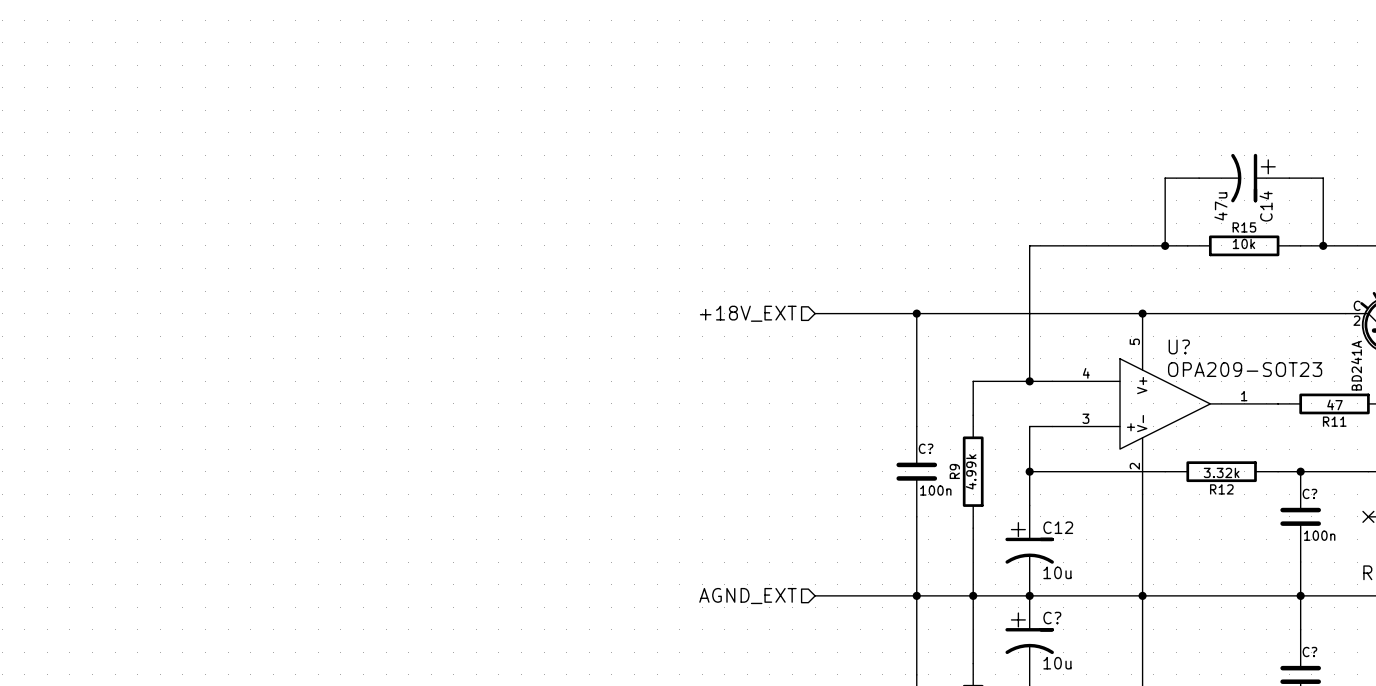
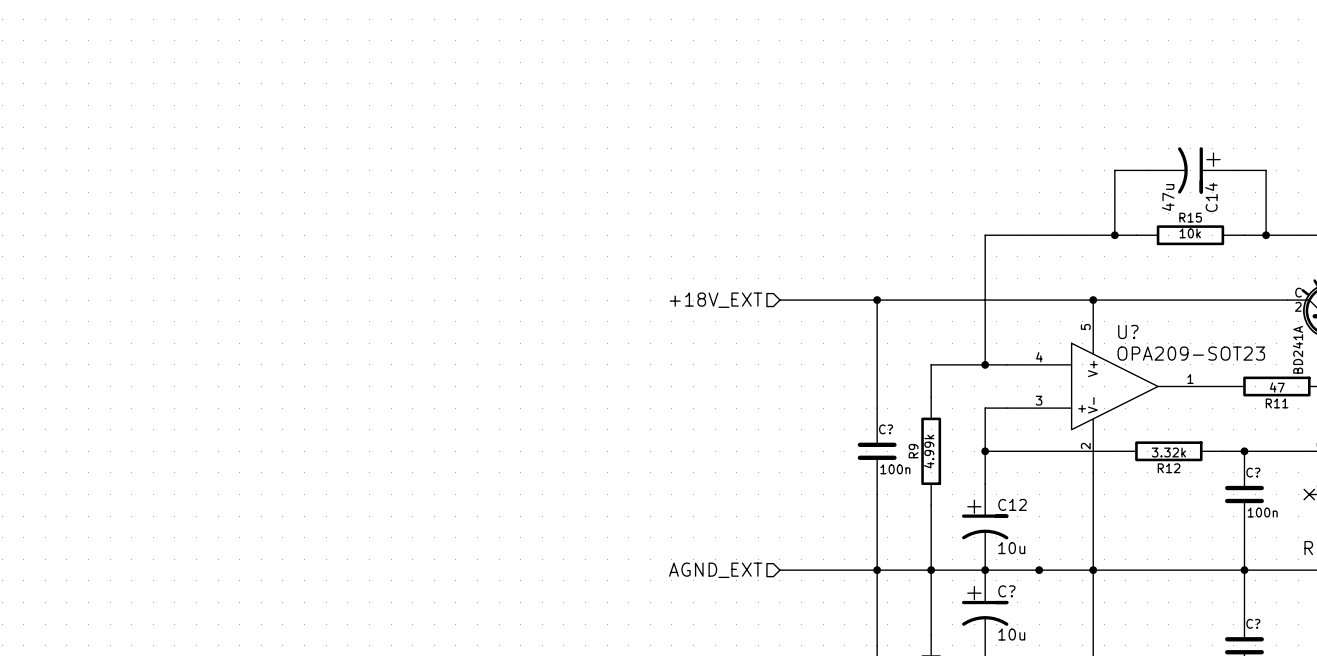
junction: none -> (1039, 570)

